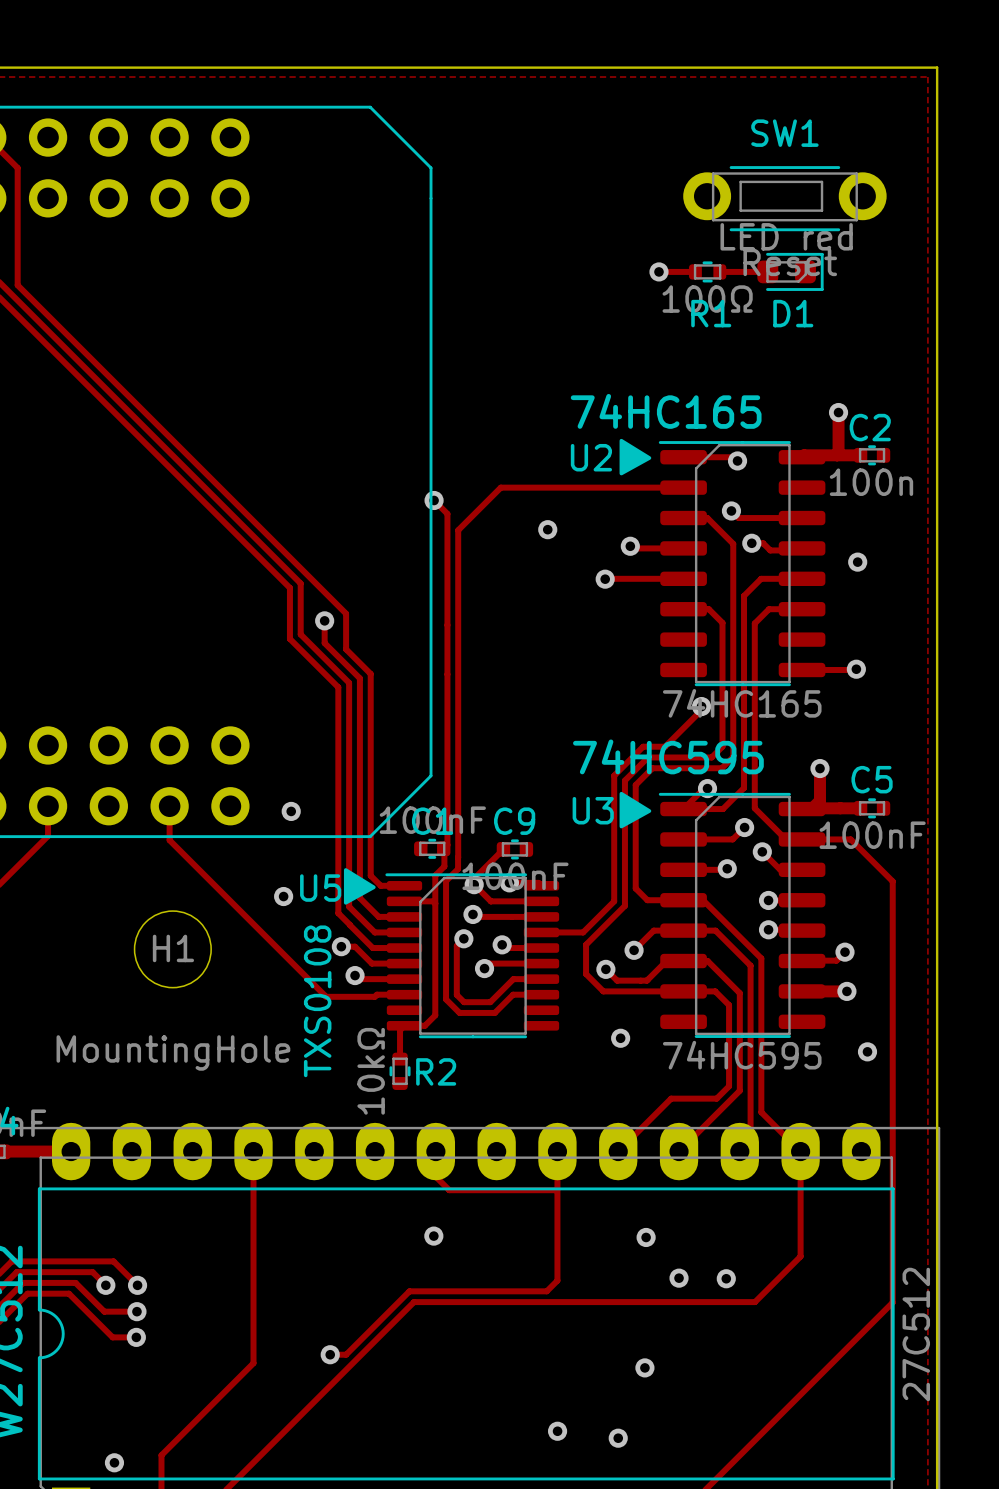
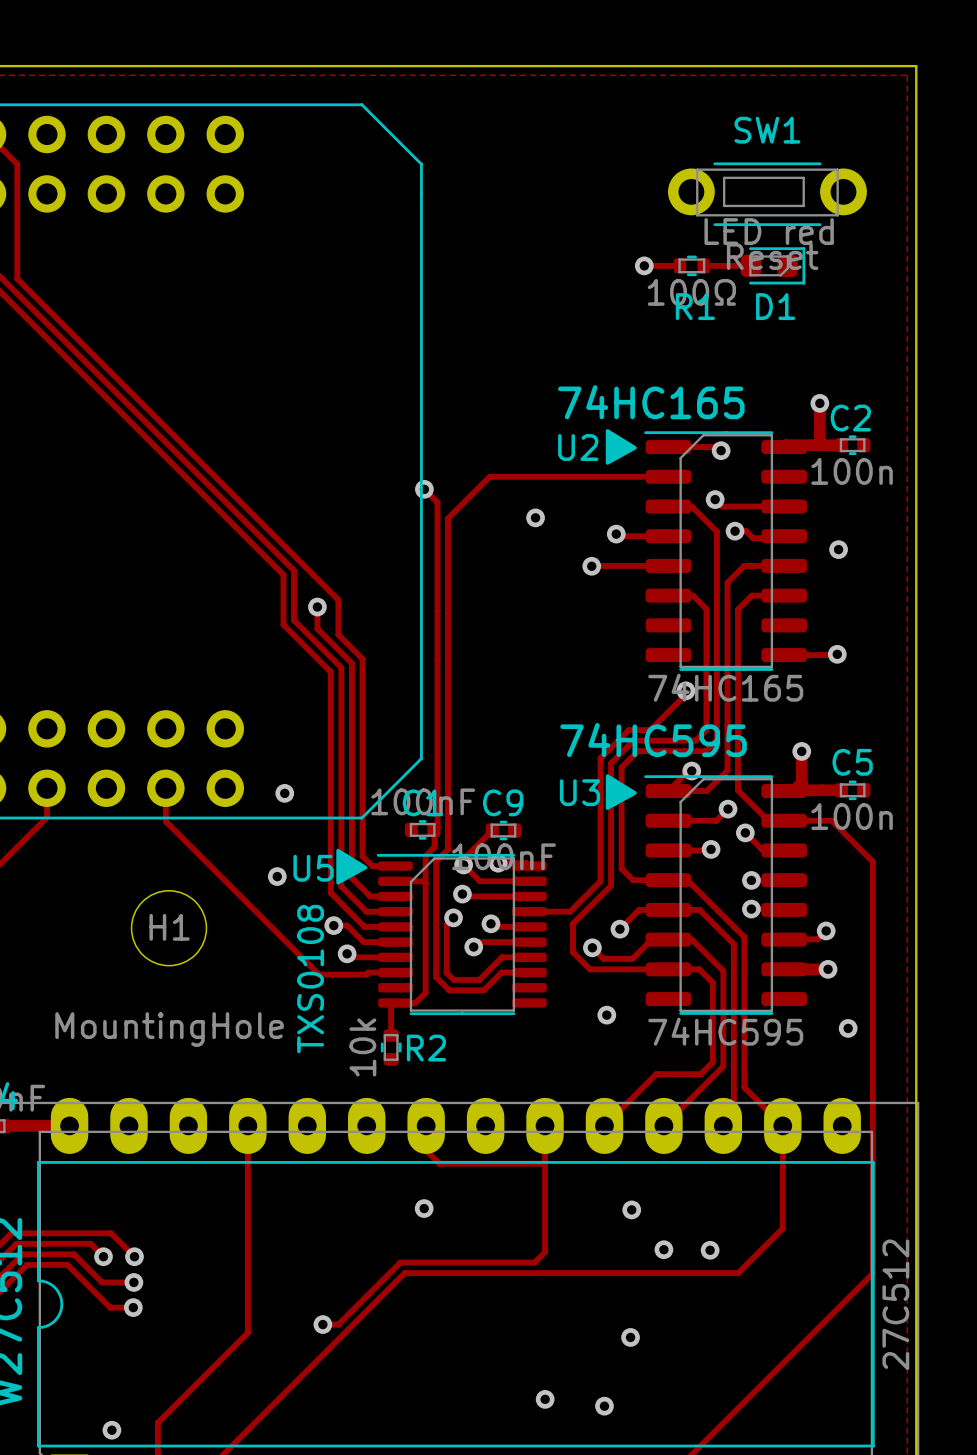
C5 value: 100nF (872, 835) -> 100n (852, 816)
R2 value: 10kΩ (371, 1071) -> 10k (362, 1047)

